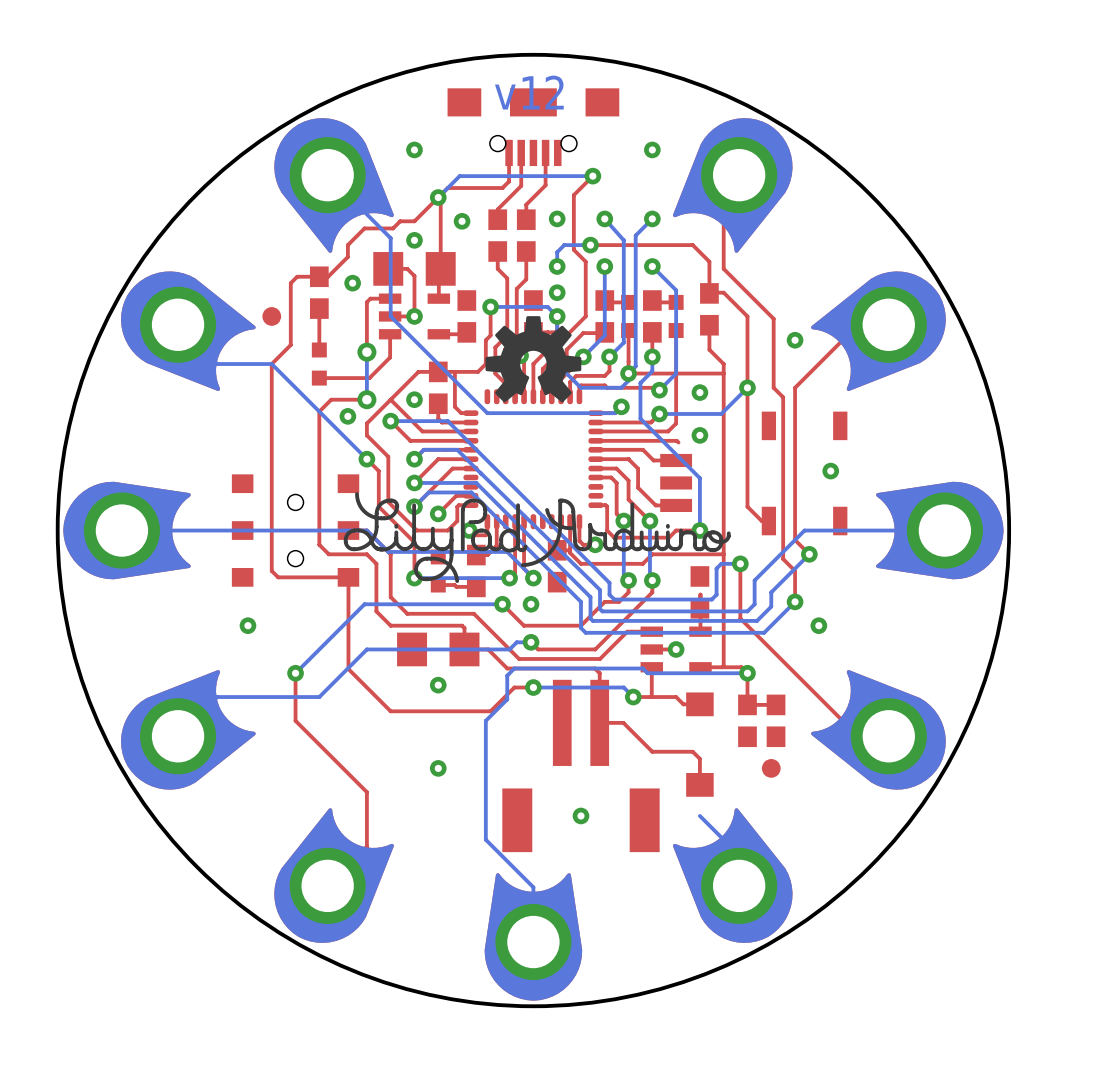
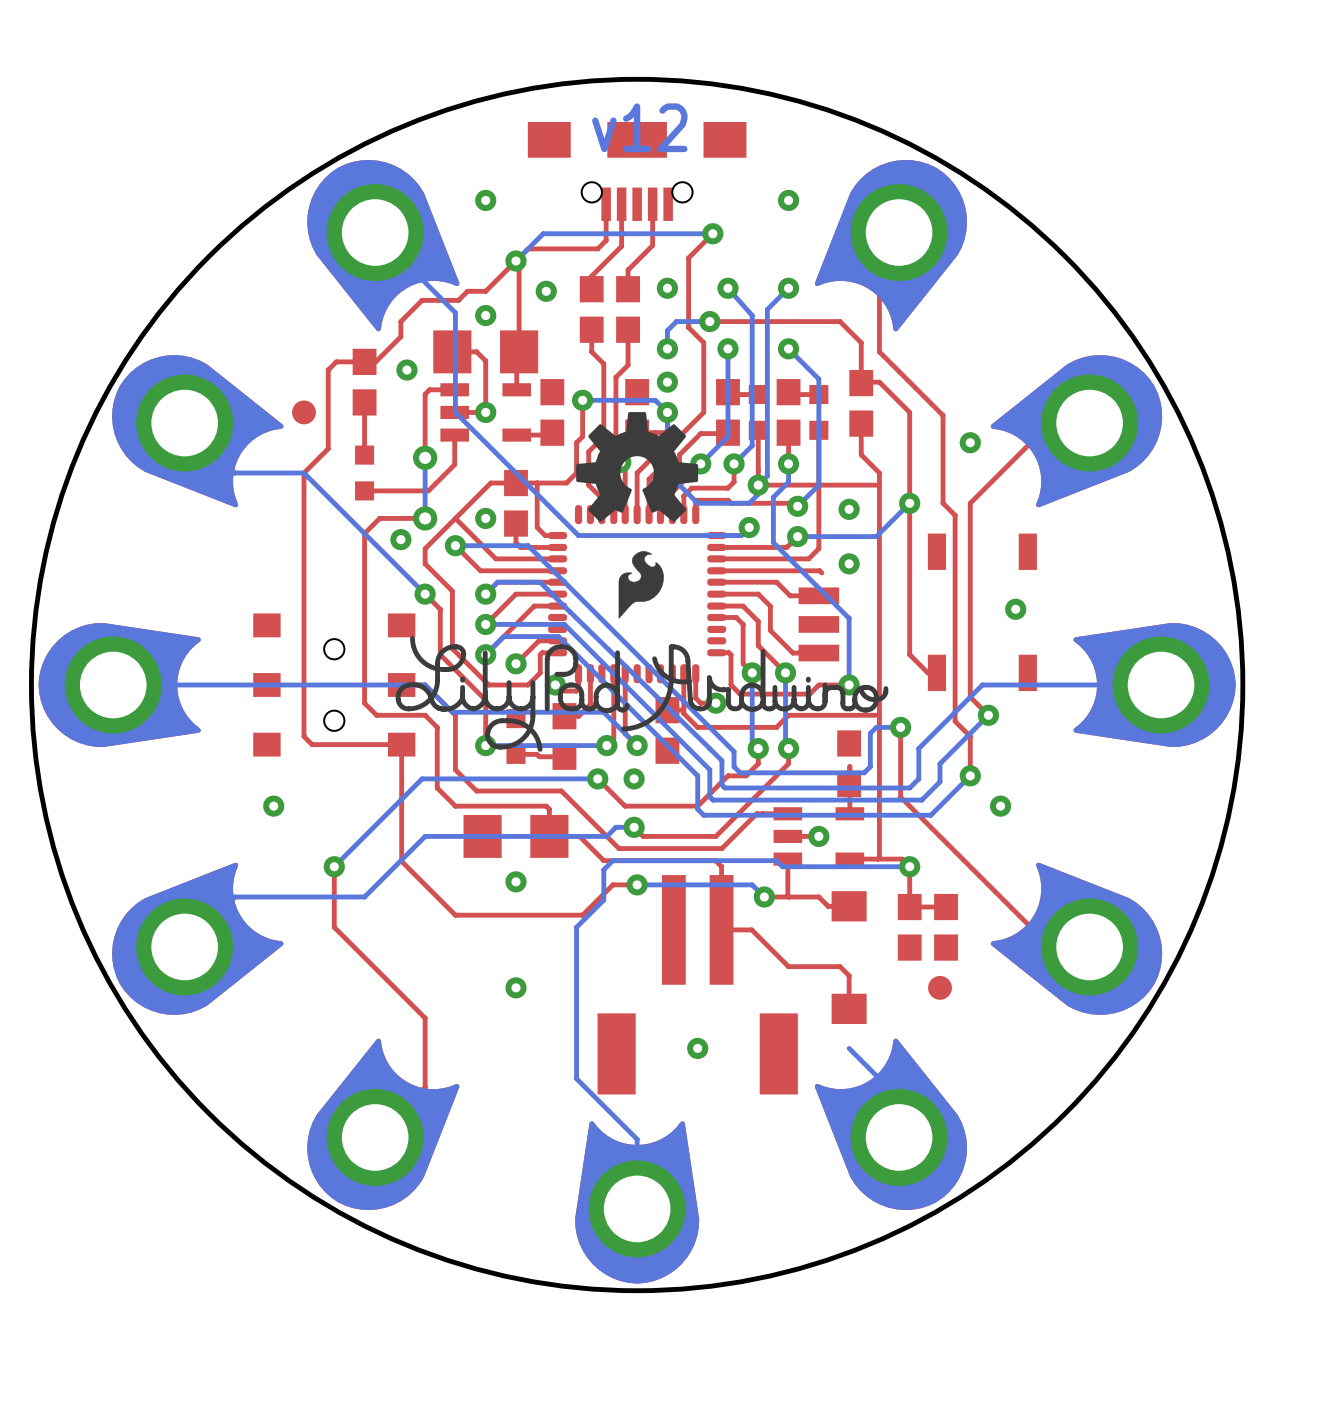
drawing: none -> [618, 551, 664, 619]

